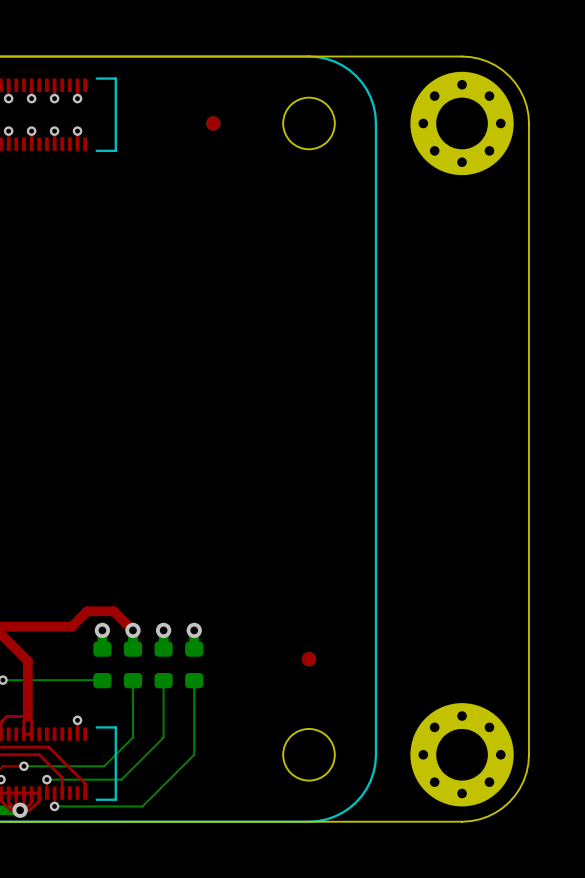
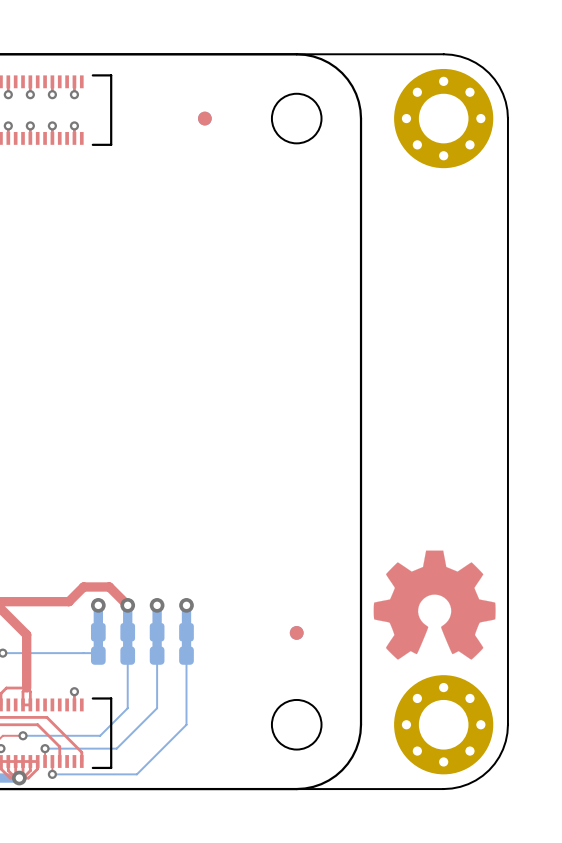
drawing: none -> [373, 550, 496, 660]
part footprint: [93, 641, 112, 689] -> [90, 623, 106, 665]
part footprint: [123, 641, 143, 689] -> [120, 623, 136, 665]
part footprint: [154, 641, 173, 689] -> [149, 623, 165, 665]
part footprint: [185, 641, 204, 689] -> [179, 623, 194, 665]

